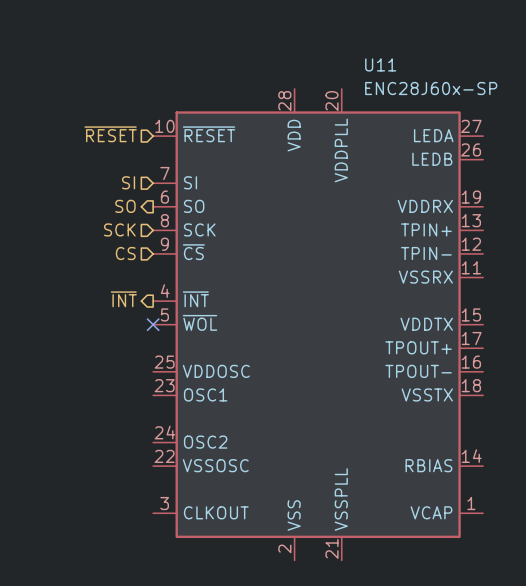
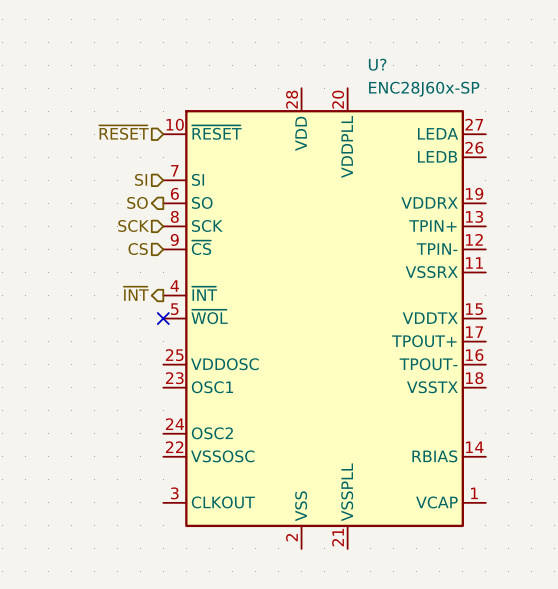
U11 name: U11 (380, 64) -> U? (377, 64)

